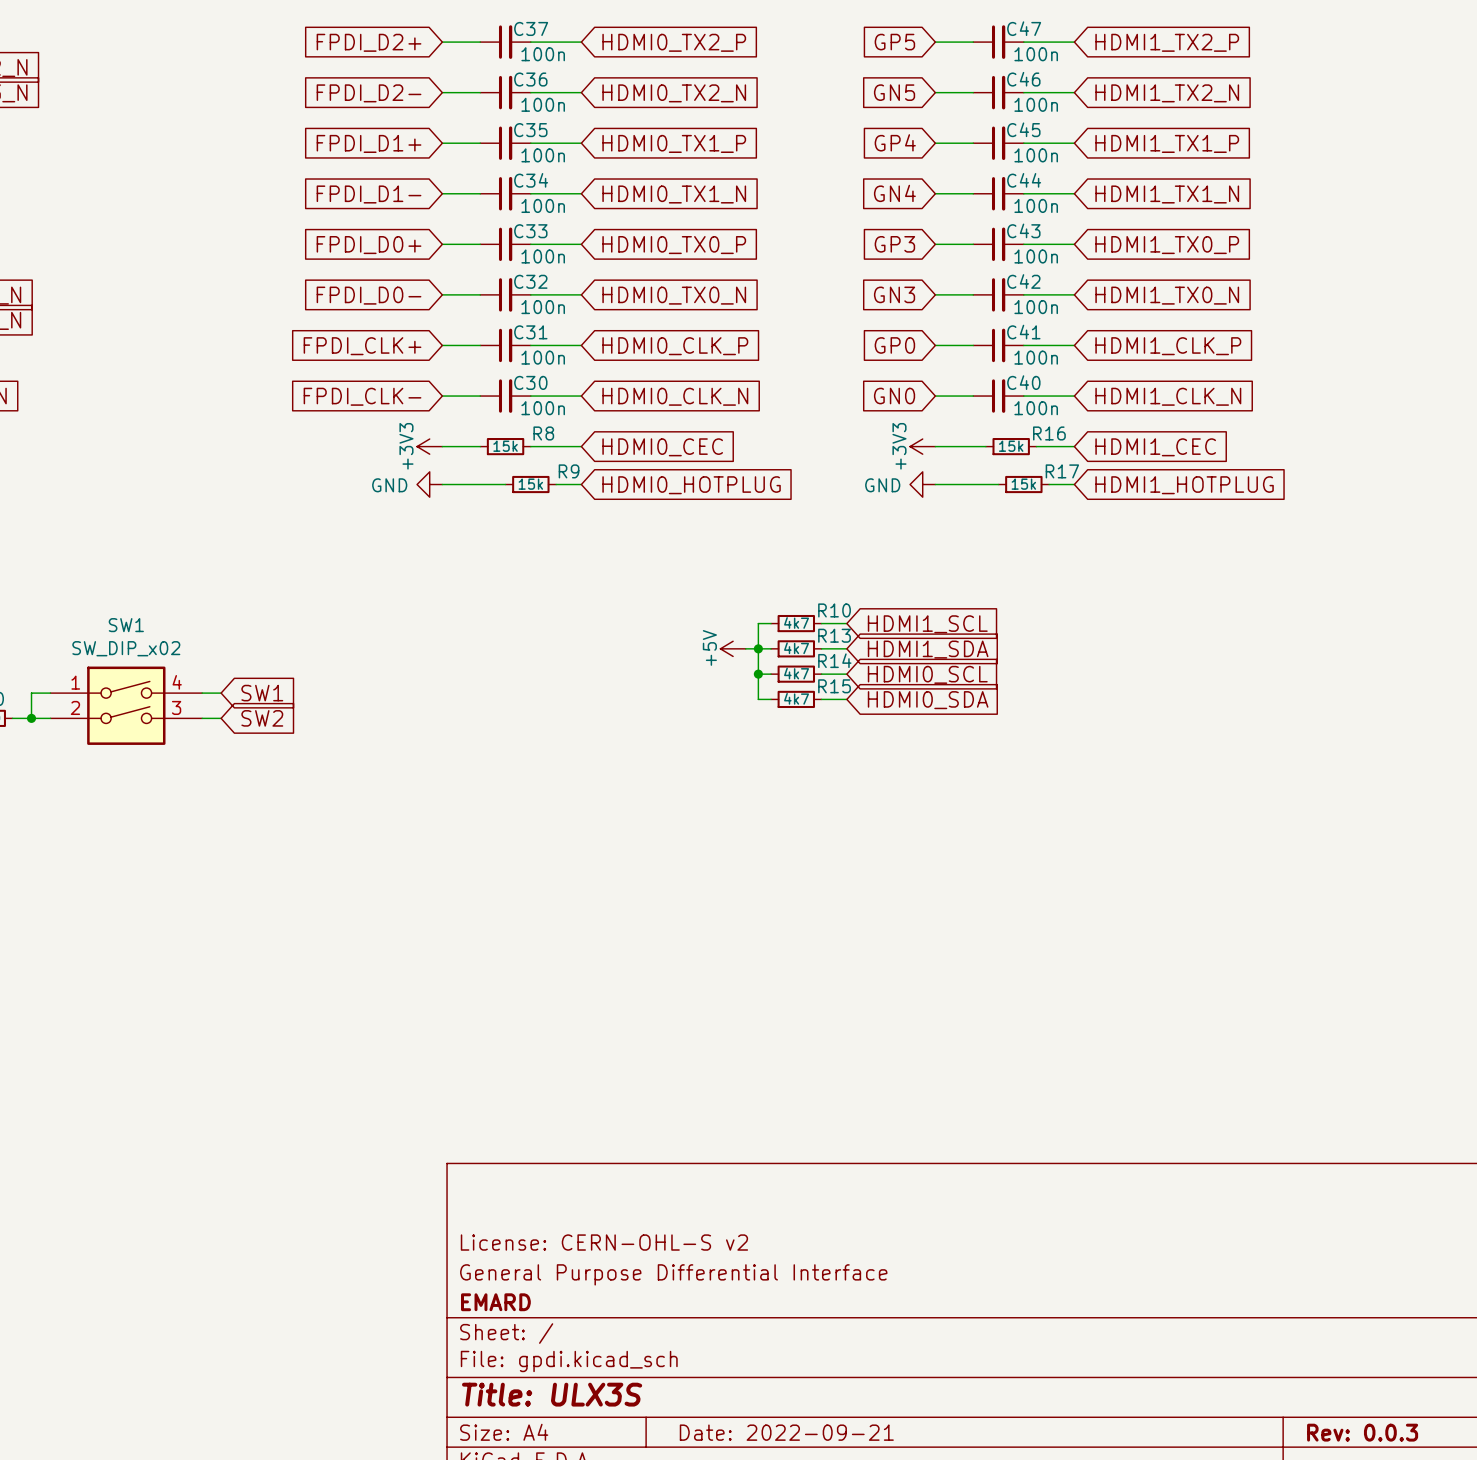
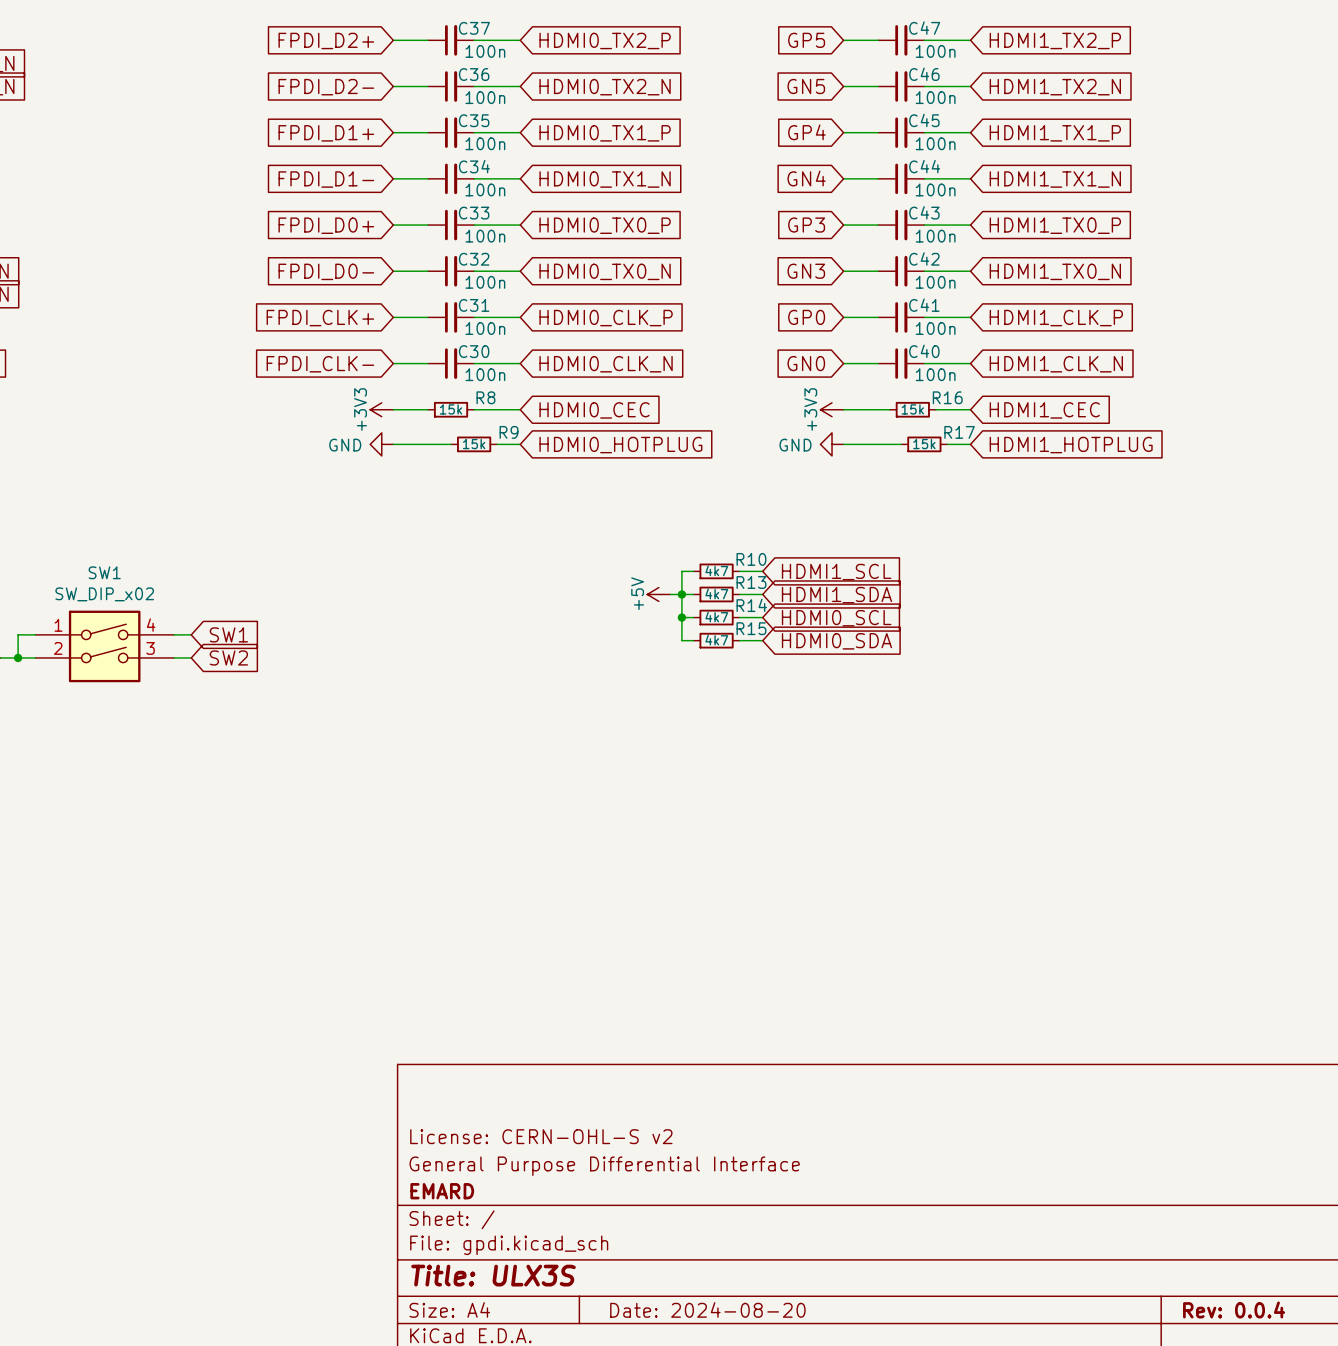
title block: Date: 2022-09-21 (786, 1432) -> Date: 2024-08-20 (707, 1309)
title block: Rev: 0.0.3 (1362, 1432) -> Rev: 0.0.4 (1234, 1309)

